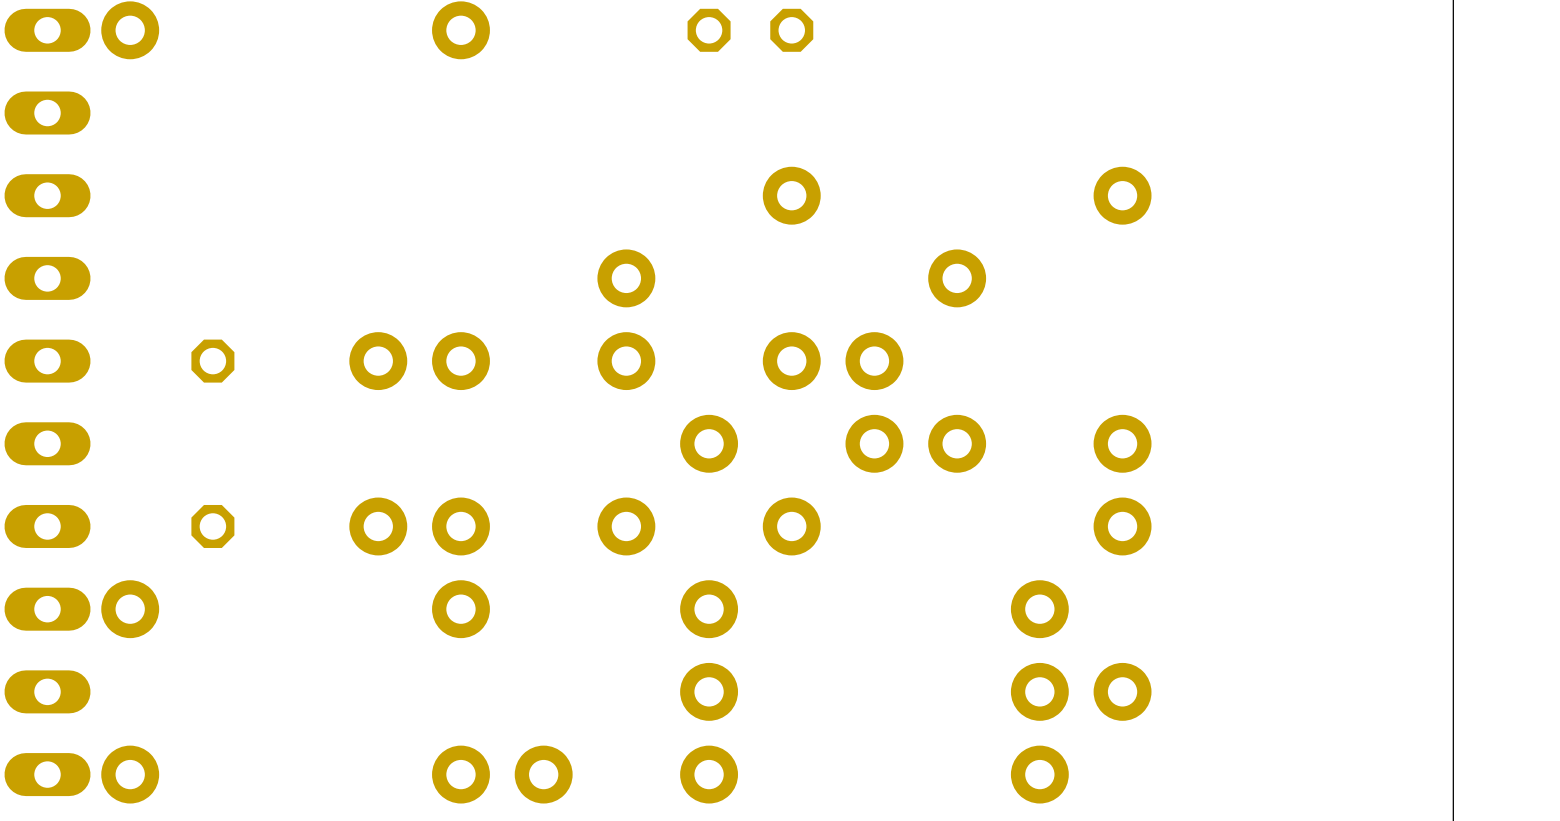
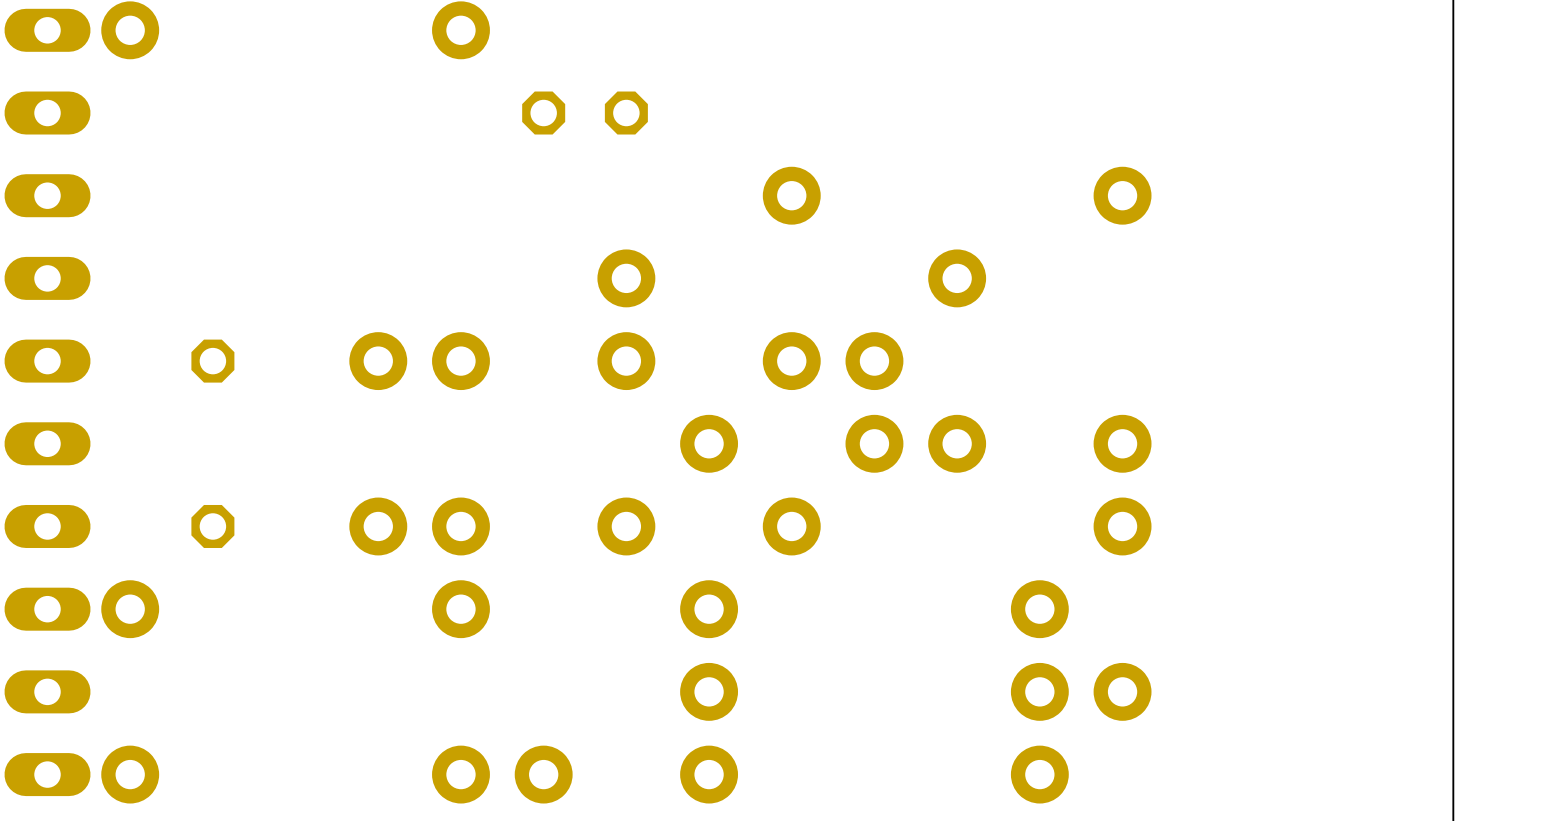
part position: (750, 30) -> (585, 113)

